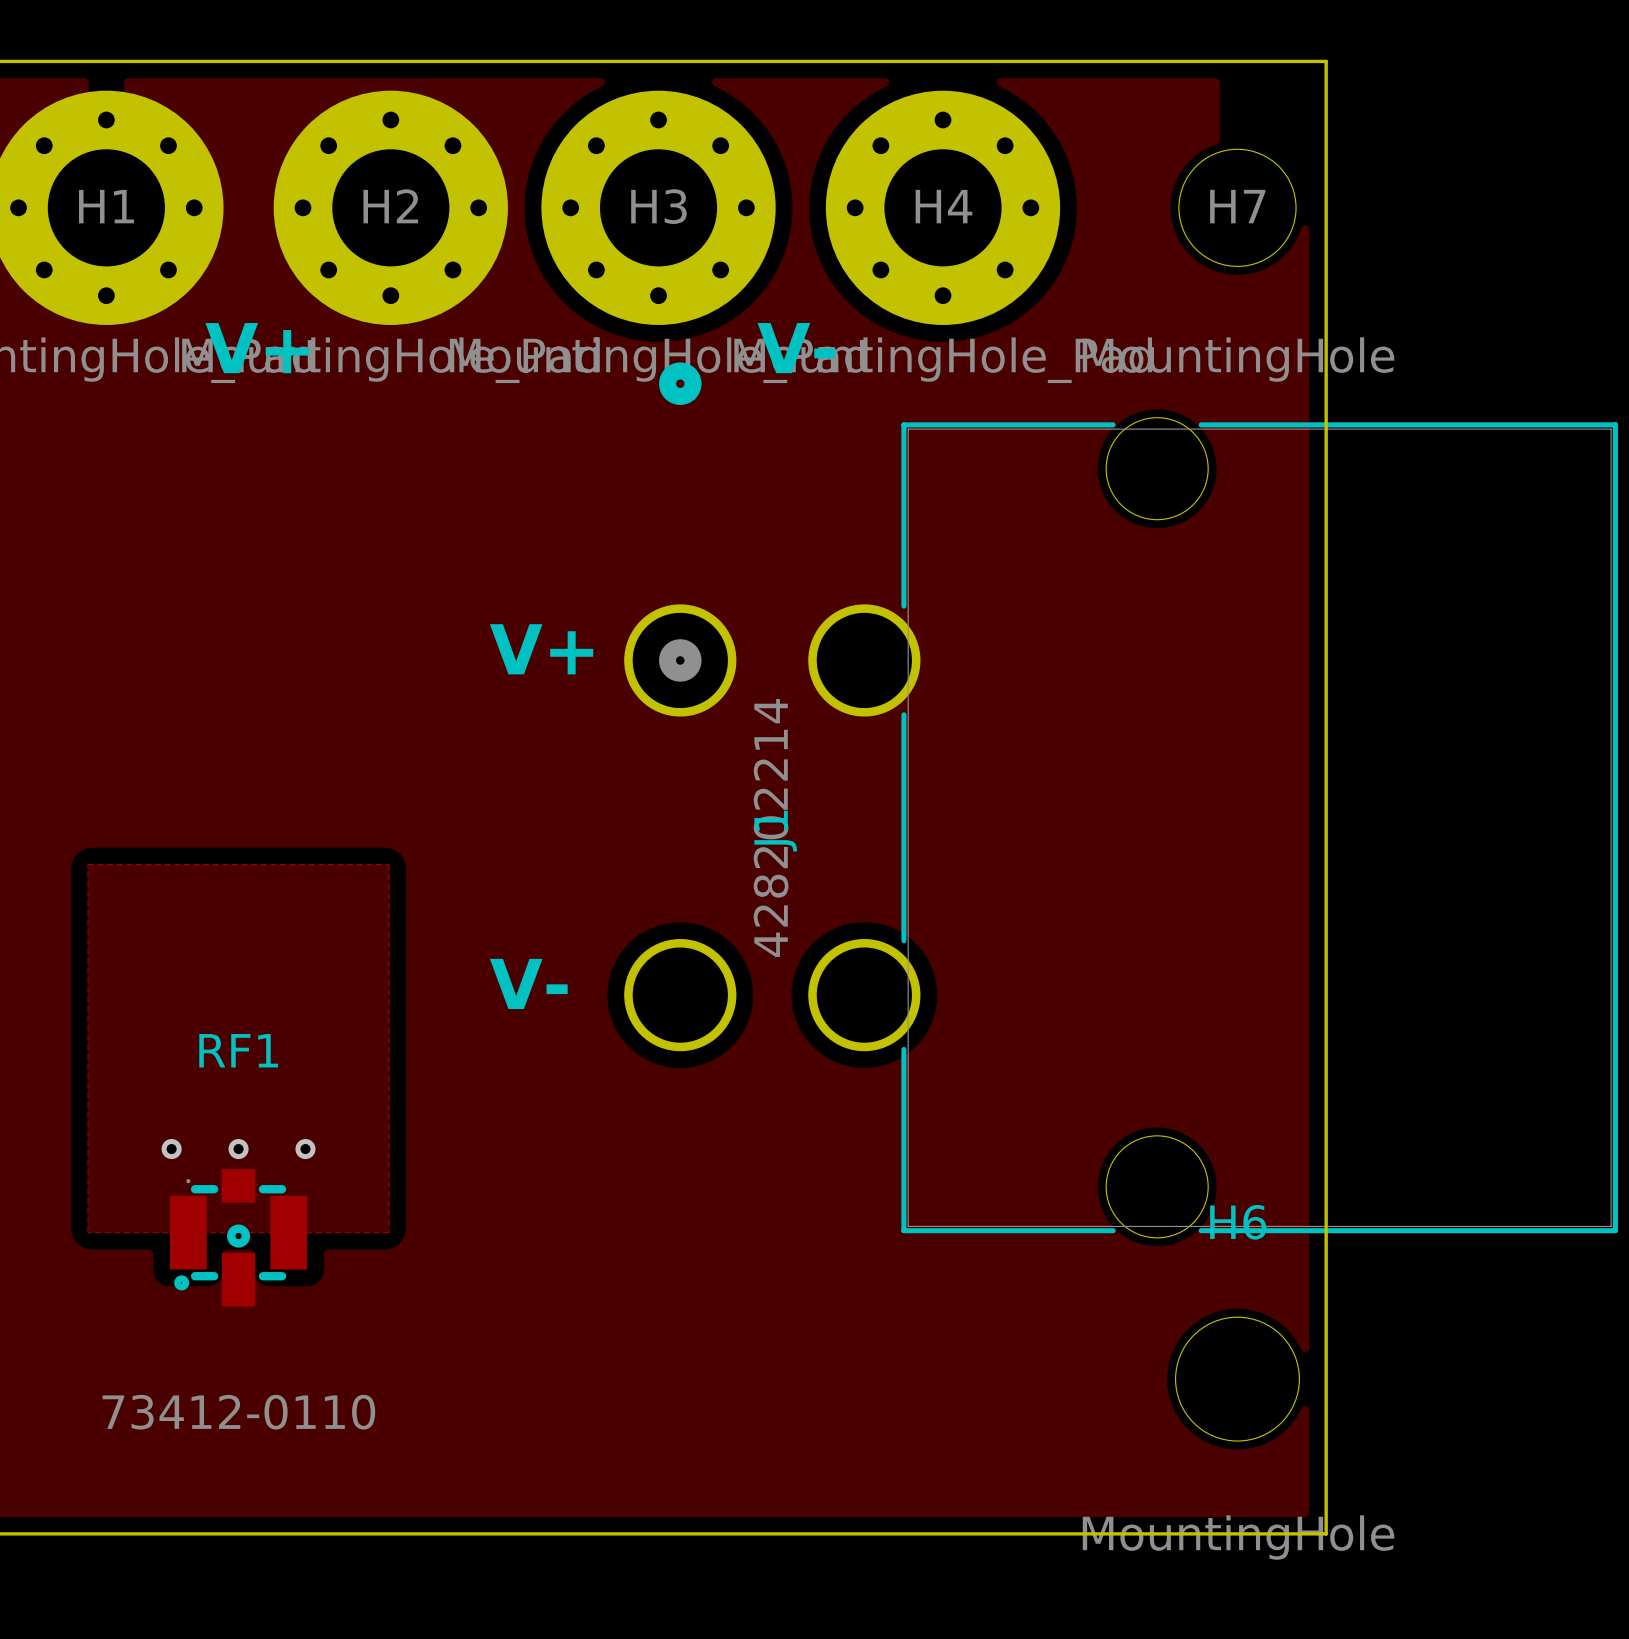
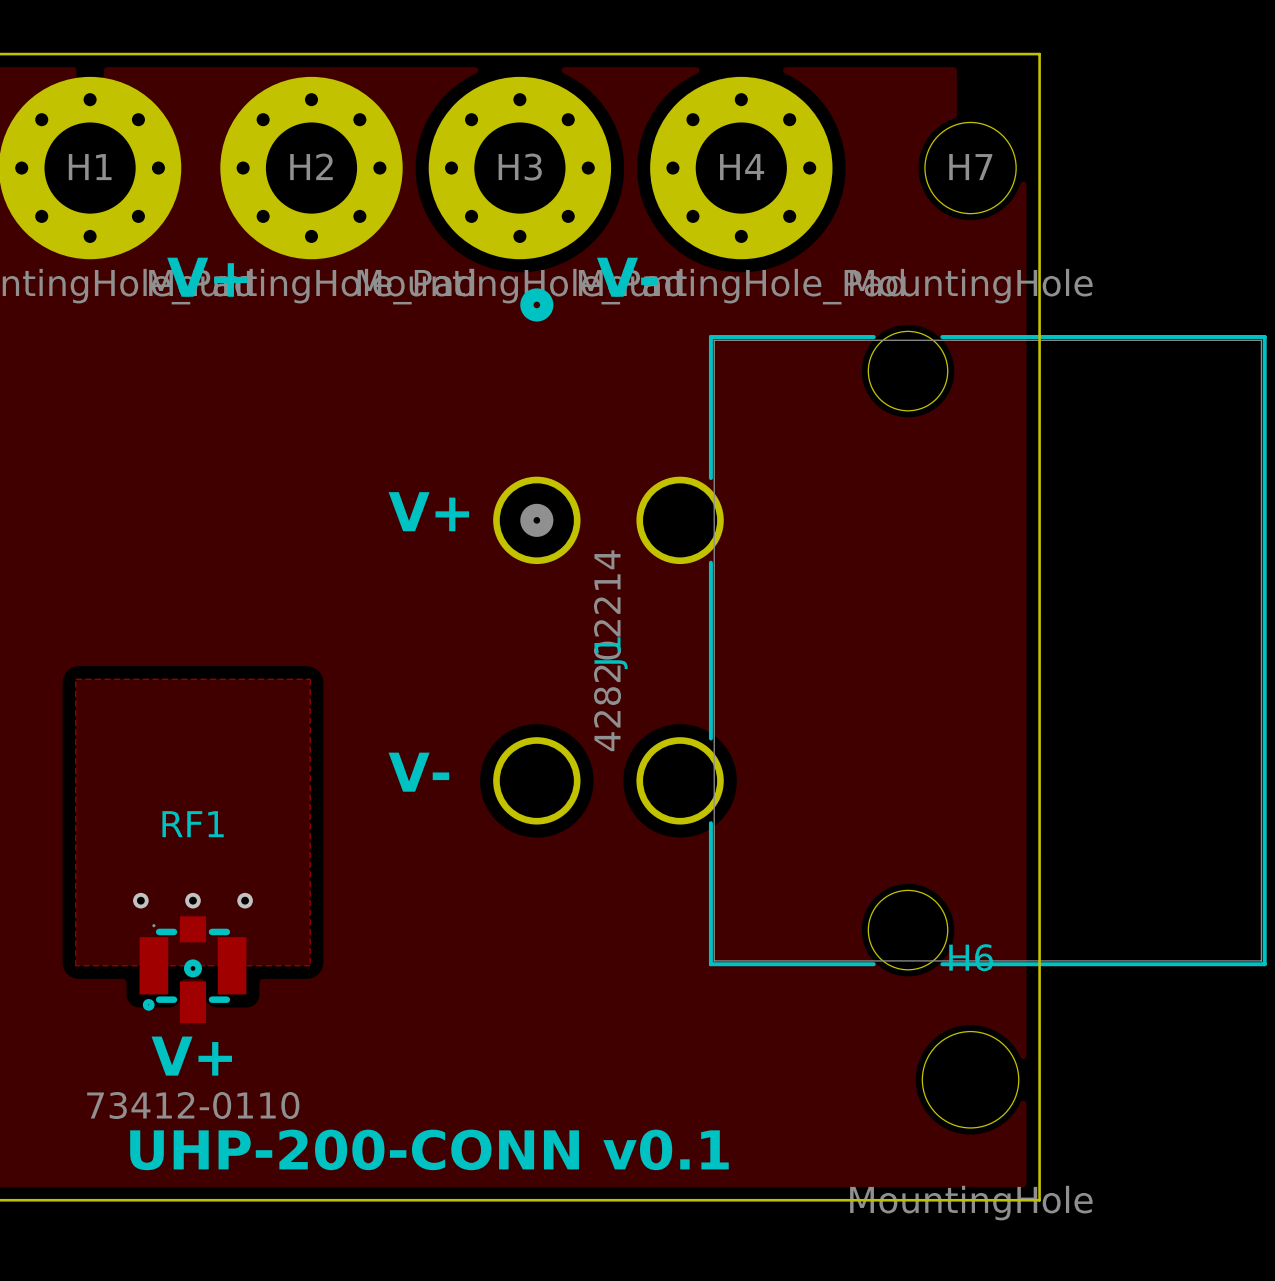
text: none -> V+ (191, 1056)
text: none -> UHP-200-CONN v0.1 (429, 1149)

